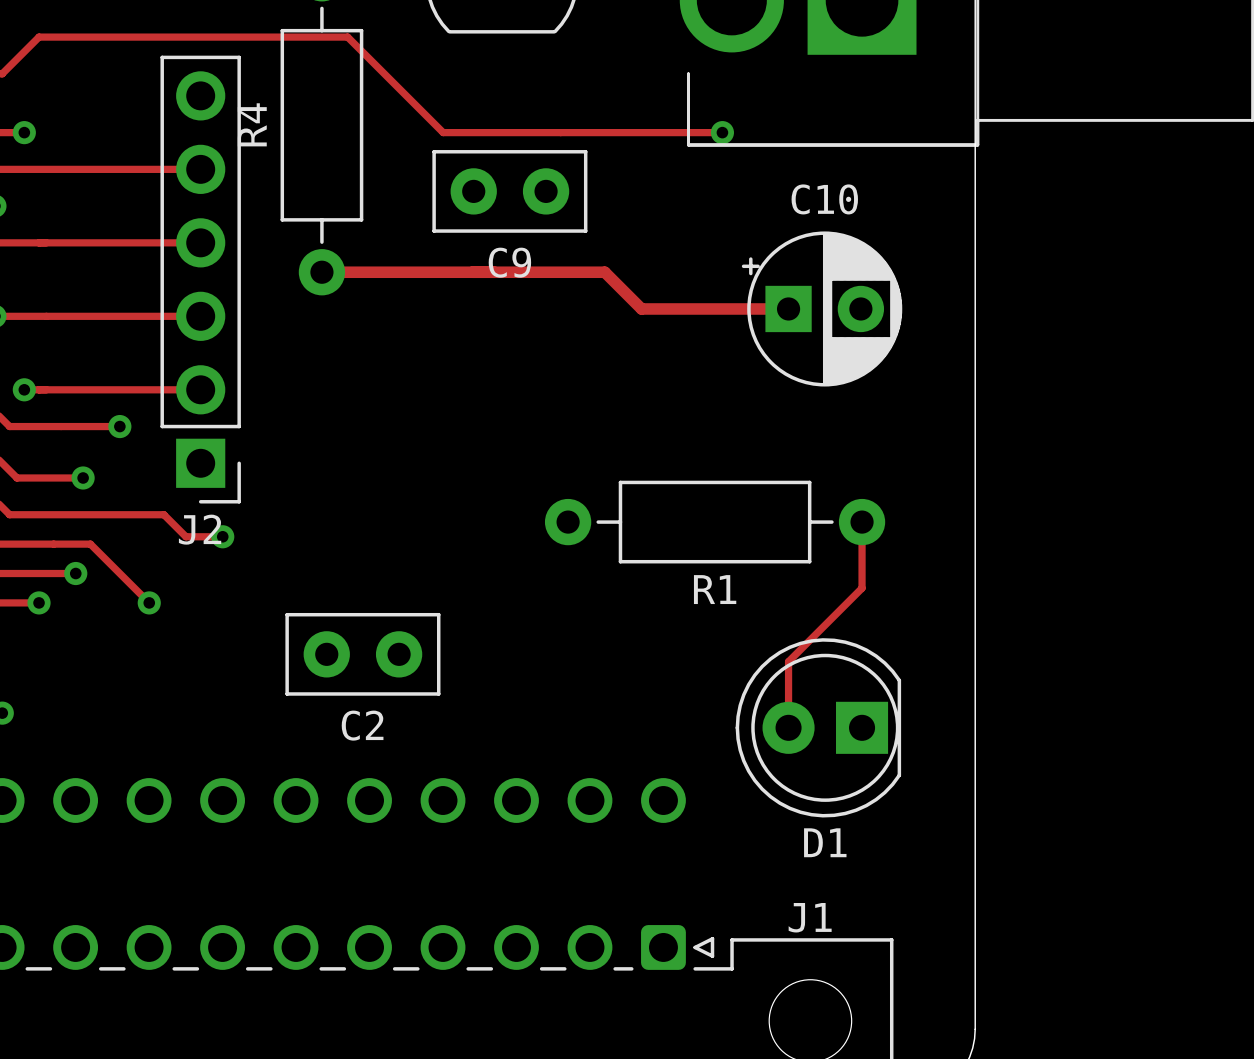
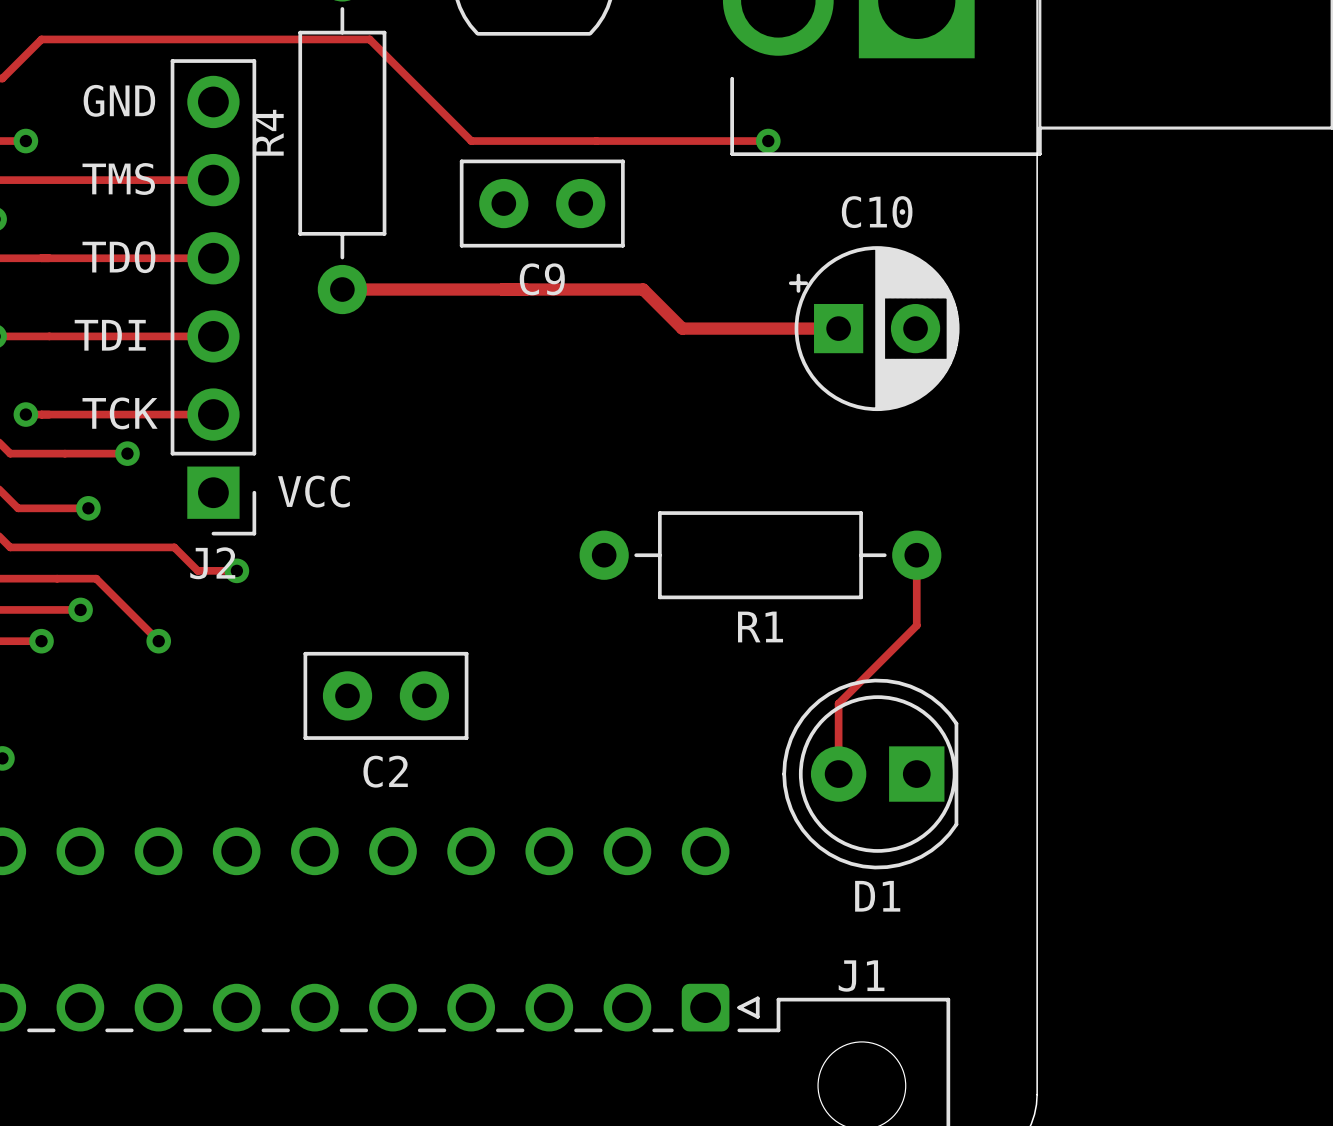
text: none -> GND (119, 100)
text: none -> TMS (118, 178)
text: none -> TDO (118, 257)
text: none -> TDI (110, 335)
text: none -> TCK (120, 413)
text: none -> VCC (313, 491)

